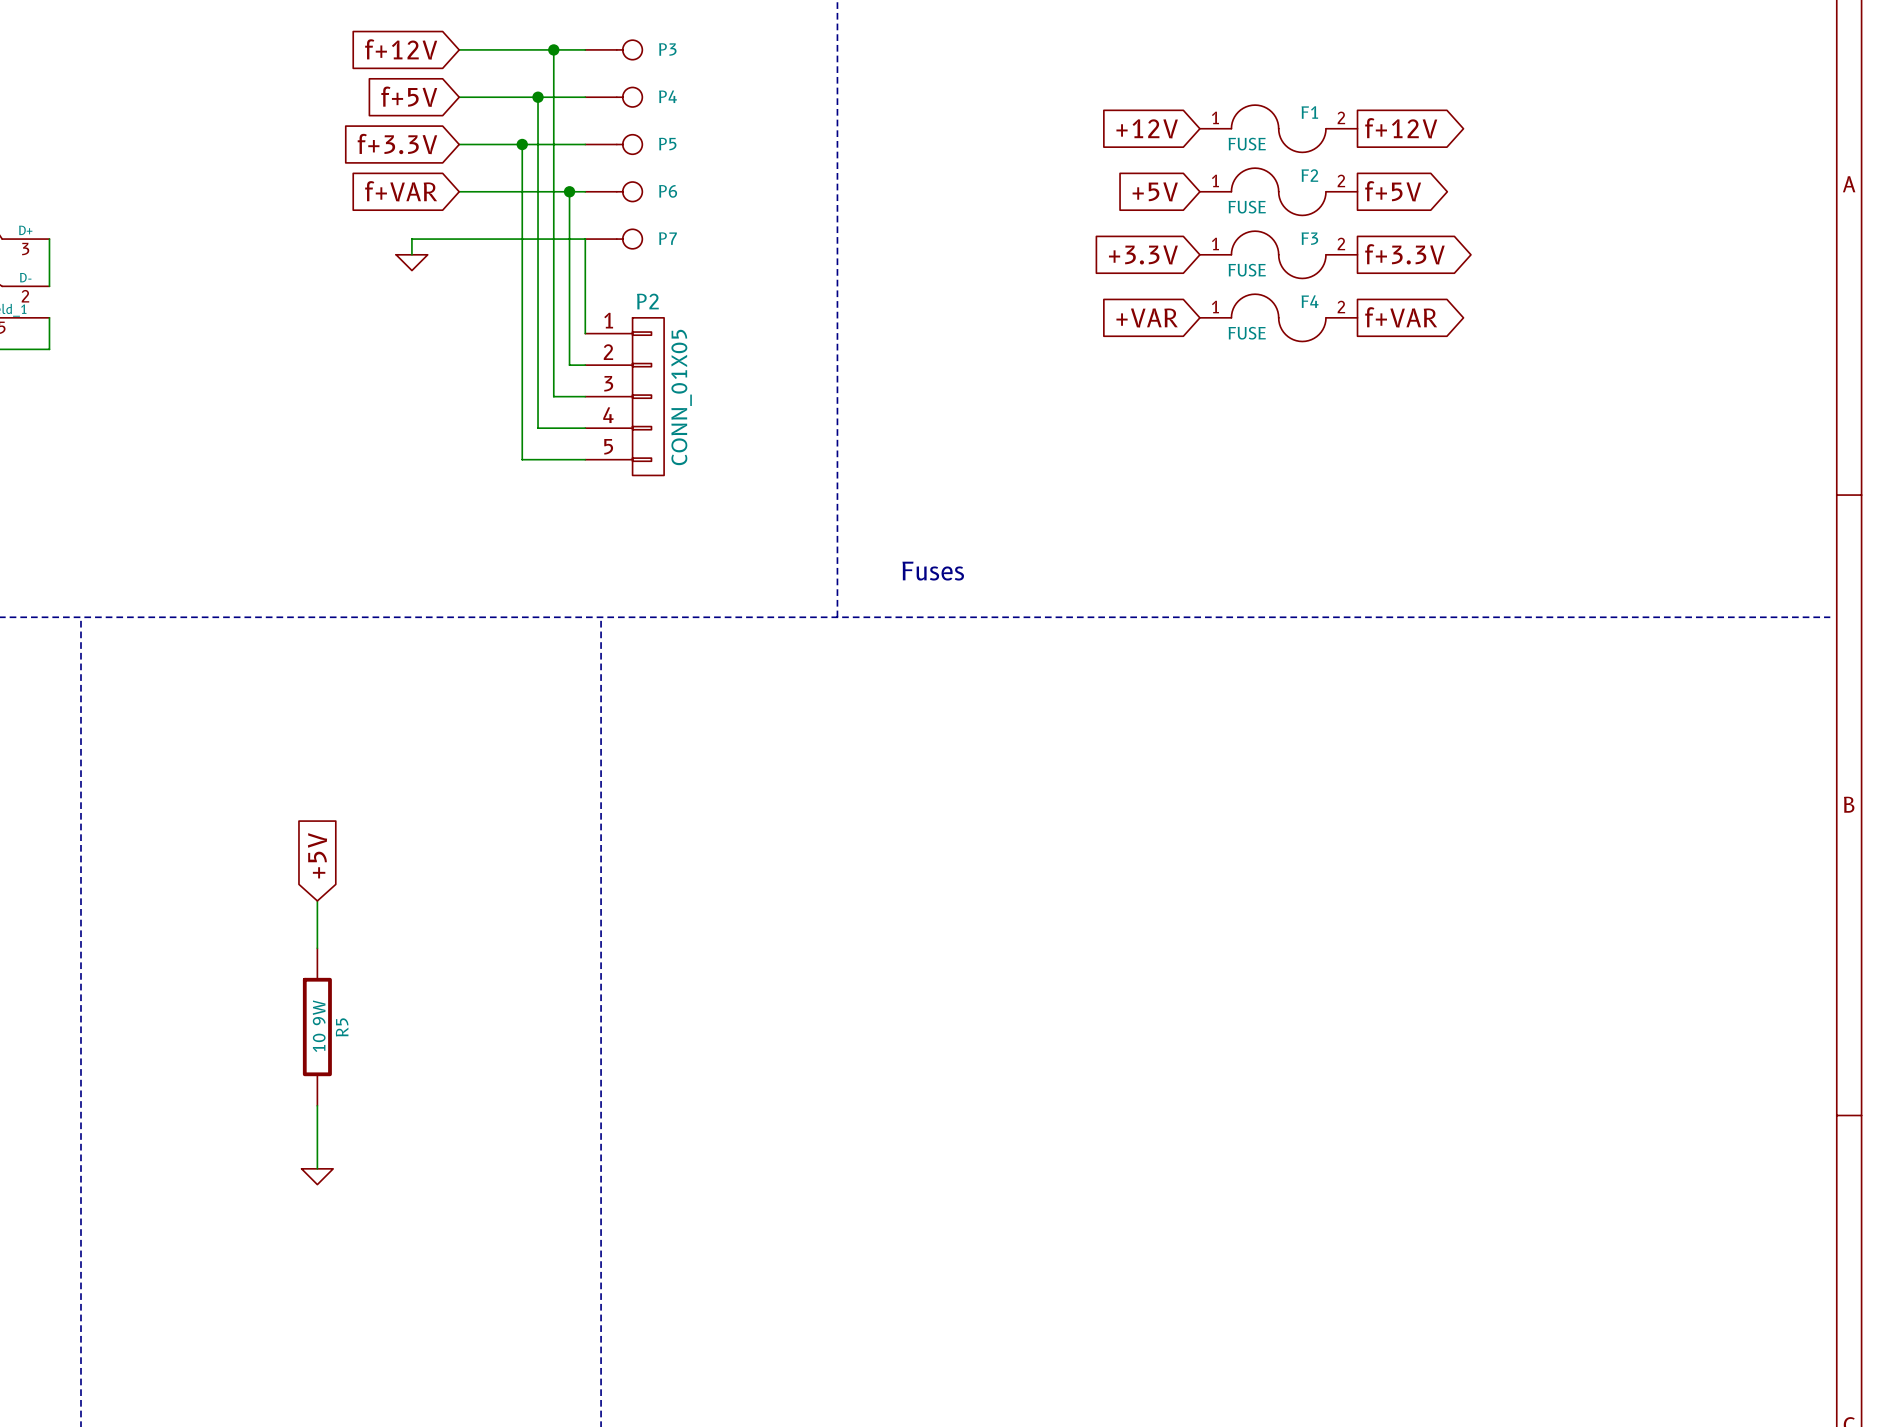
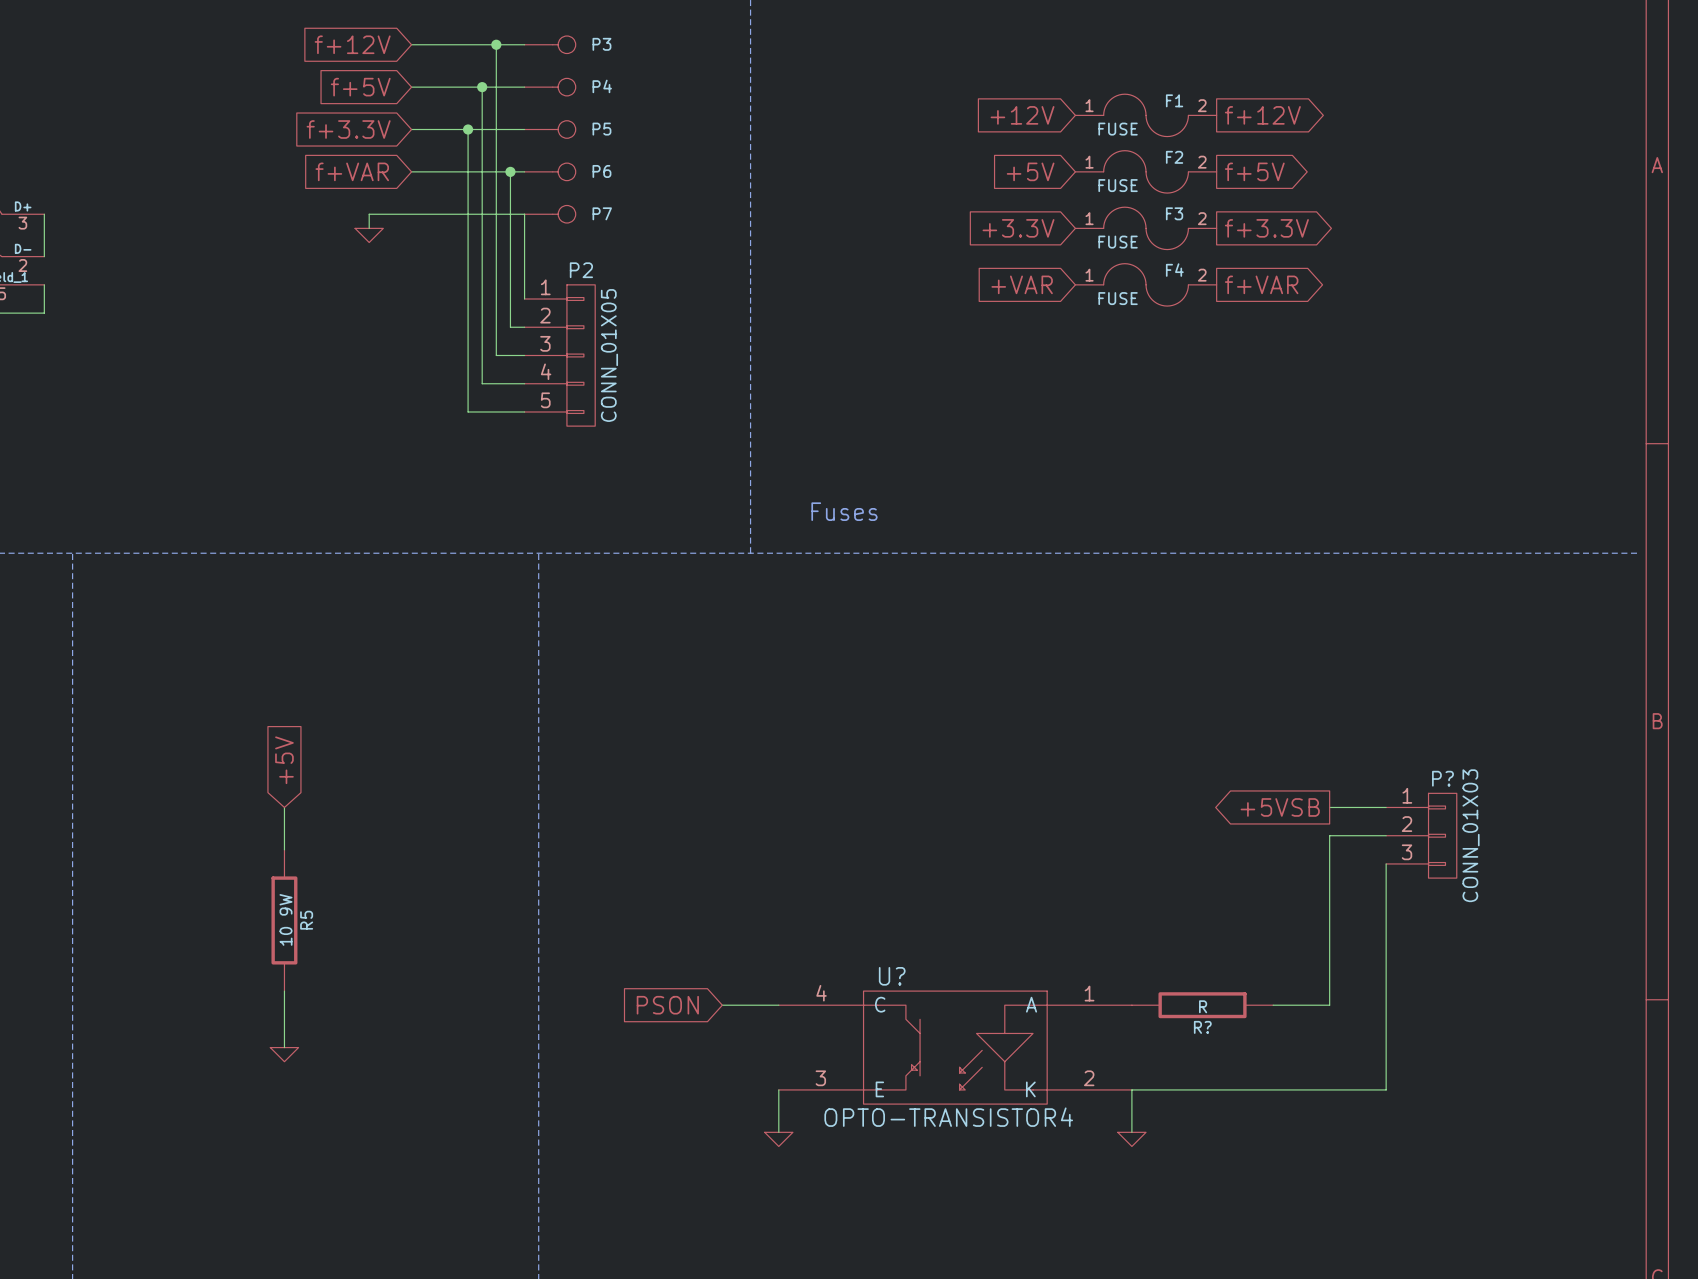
wire: none -> (1329, 807) (1386, 807)
global label: none -> +5VSB (1280, 807)
wire: none -> (1386, 835) (1329, 835) (1329, 1005) (1273, 1005)
P?: none -> CONN_01X03 (1421, 835)
wire: none -> (1386, 863) (1386, 1089) (1131, 1089) (1131, 1132)
global label: none -> PSON (667, 1005)
wire: none -> (722, 1005) (778, 1005)
R?: none -> R (1202, 1005)
U?: none -> OPTO-TRANSISTOR4 (955, 1047)
wire: none -> (778, 1089) (778, 1132)
power symbol: none -> (778, 1139)
power symbol: none -> (1131, 1139)

